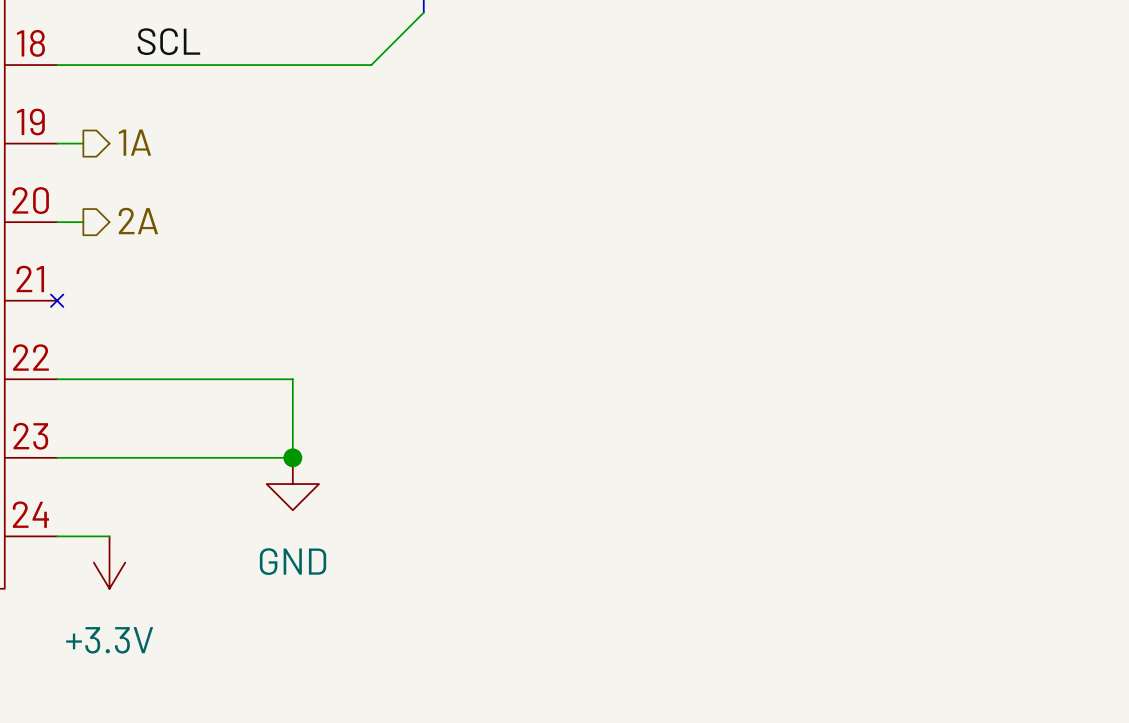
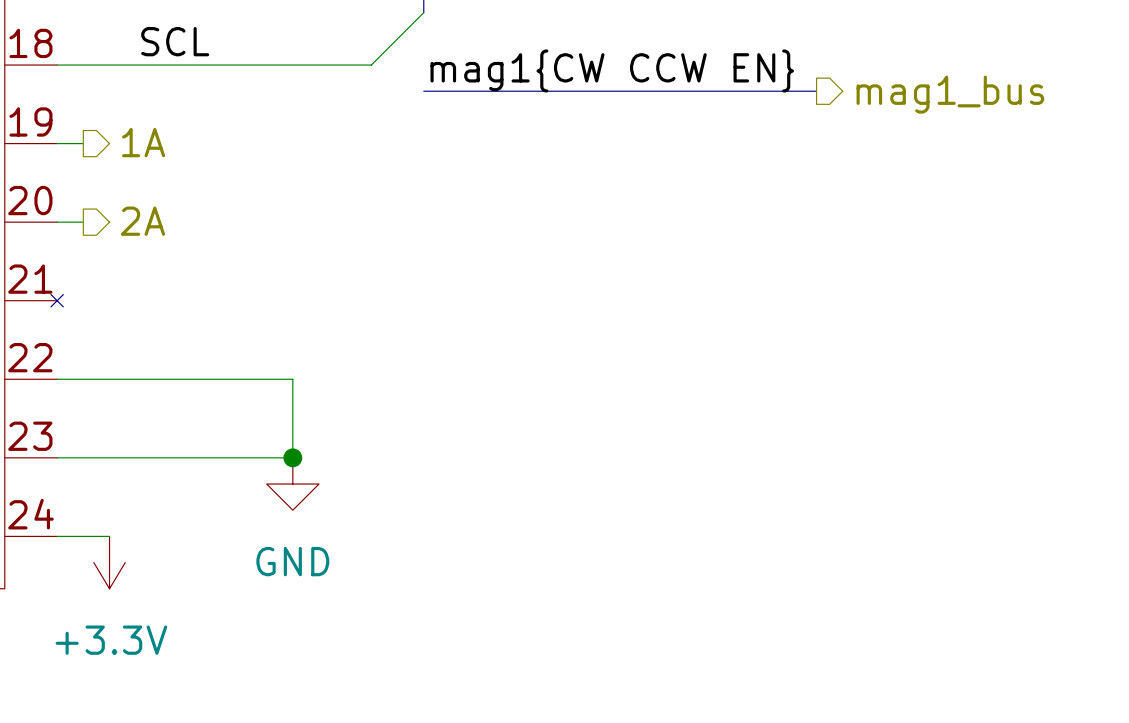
label: none -> mag1{CW CCW EN} (612, 70)
bus: none -> (423, 91) (816, 91)
hierarchical label: none -> mag1_bus (950, 94)

